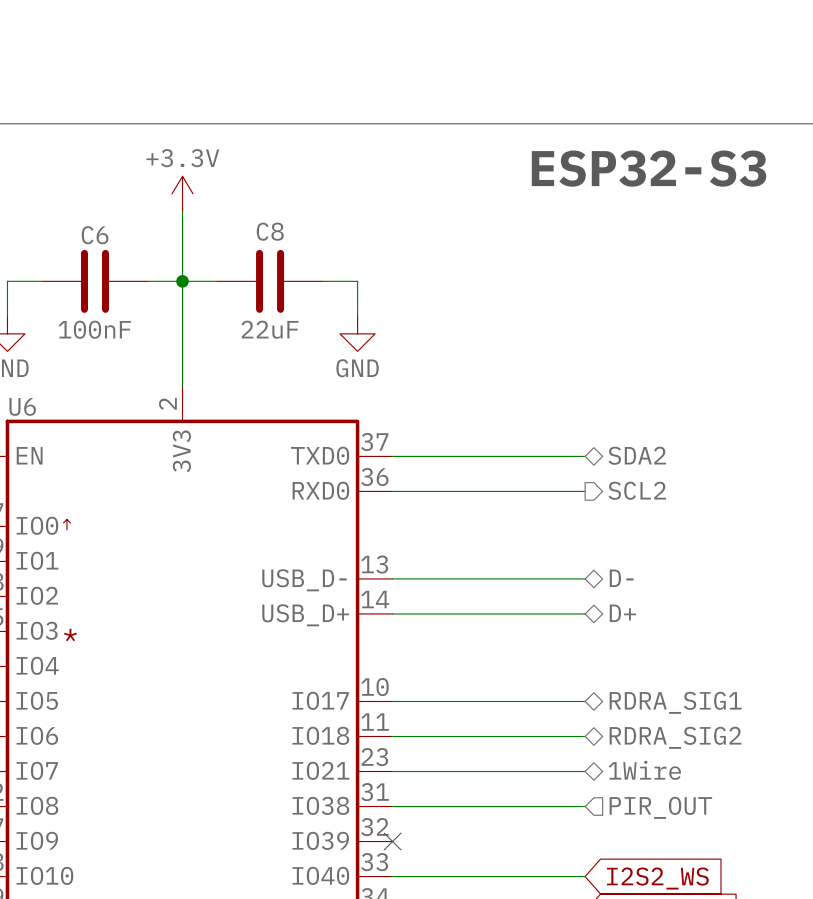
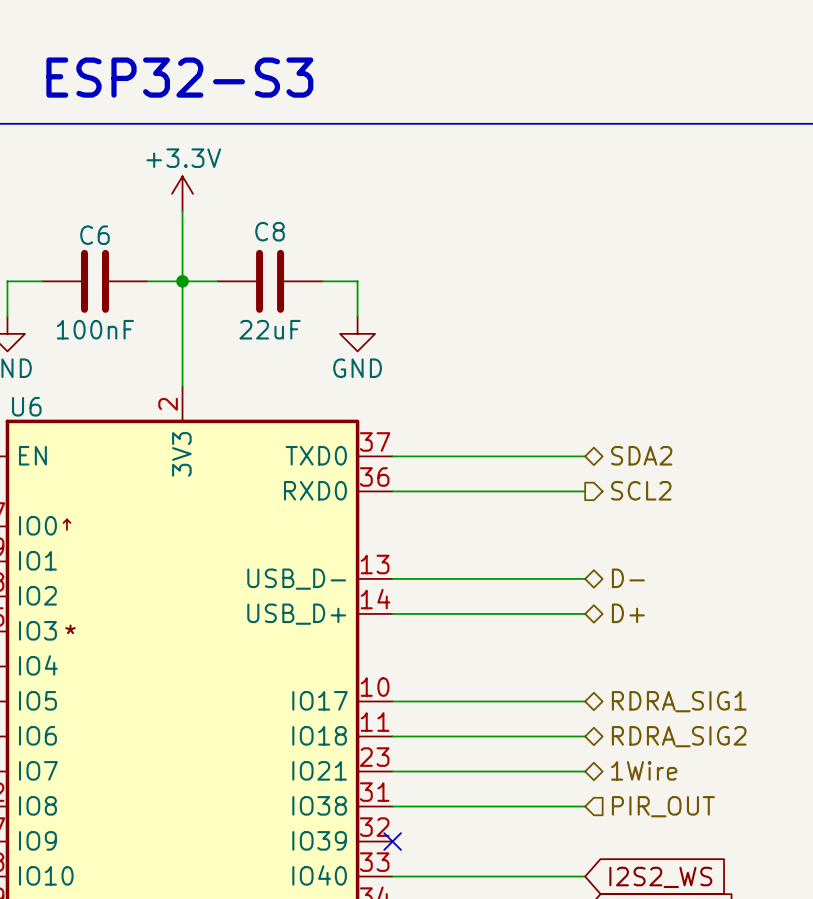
text: none -> ESP32-S3 (179, 77)
text: ESP32-S3 (649, 168) -> none

